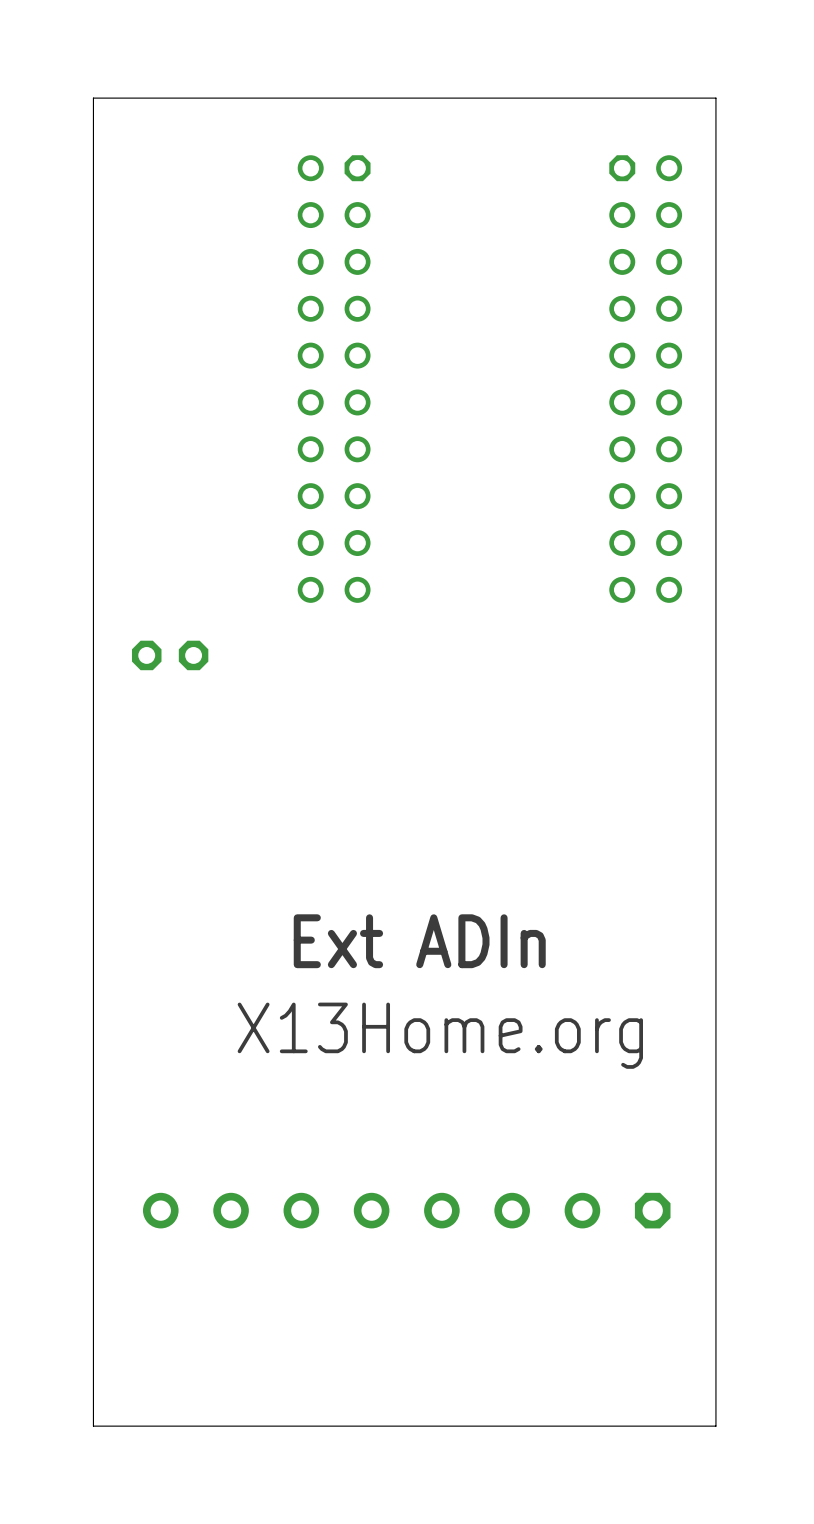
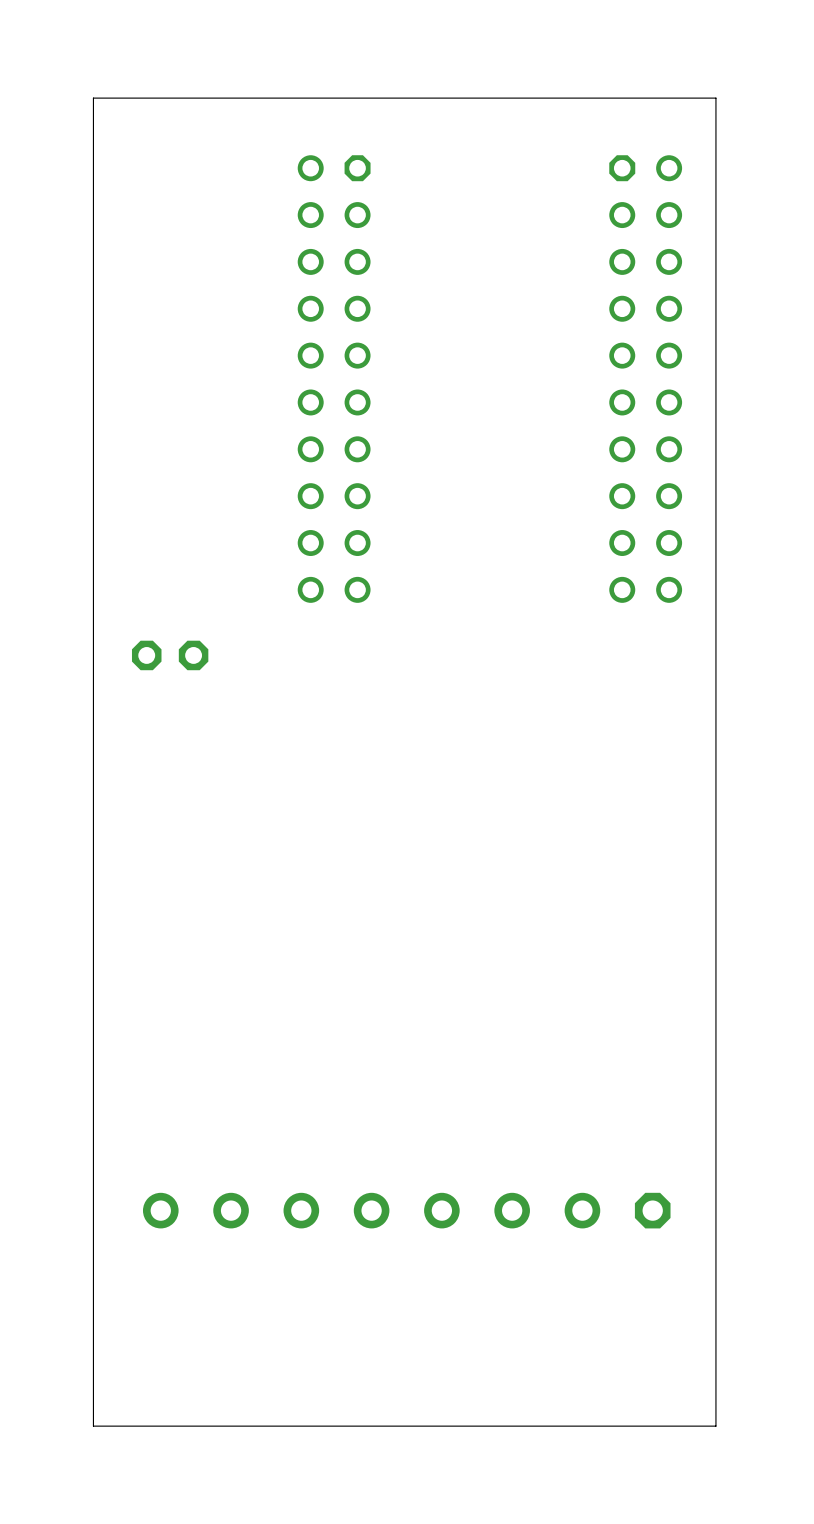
text: Ext ADIn (419, 941) -> none
text: X13Home.org (440, 1035) -> none

